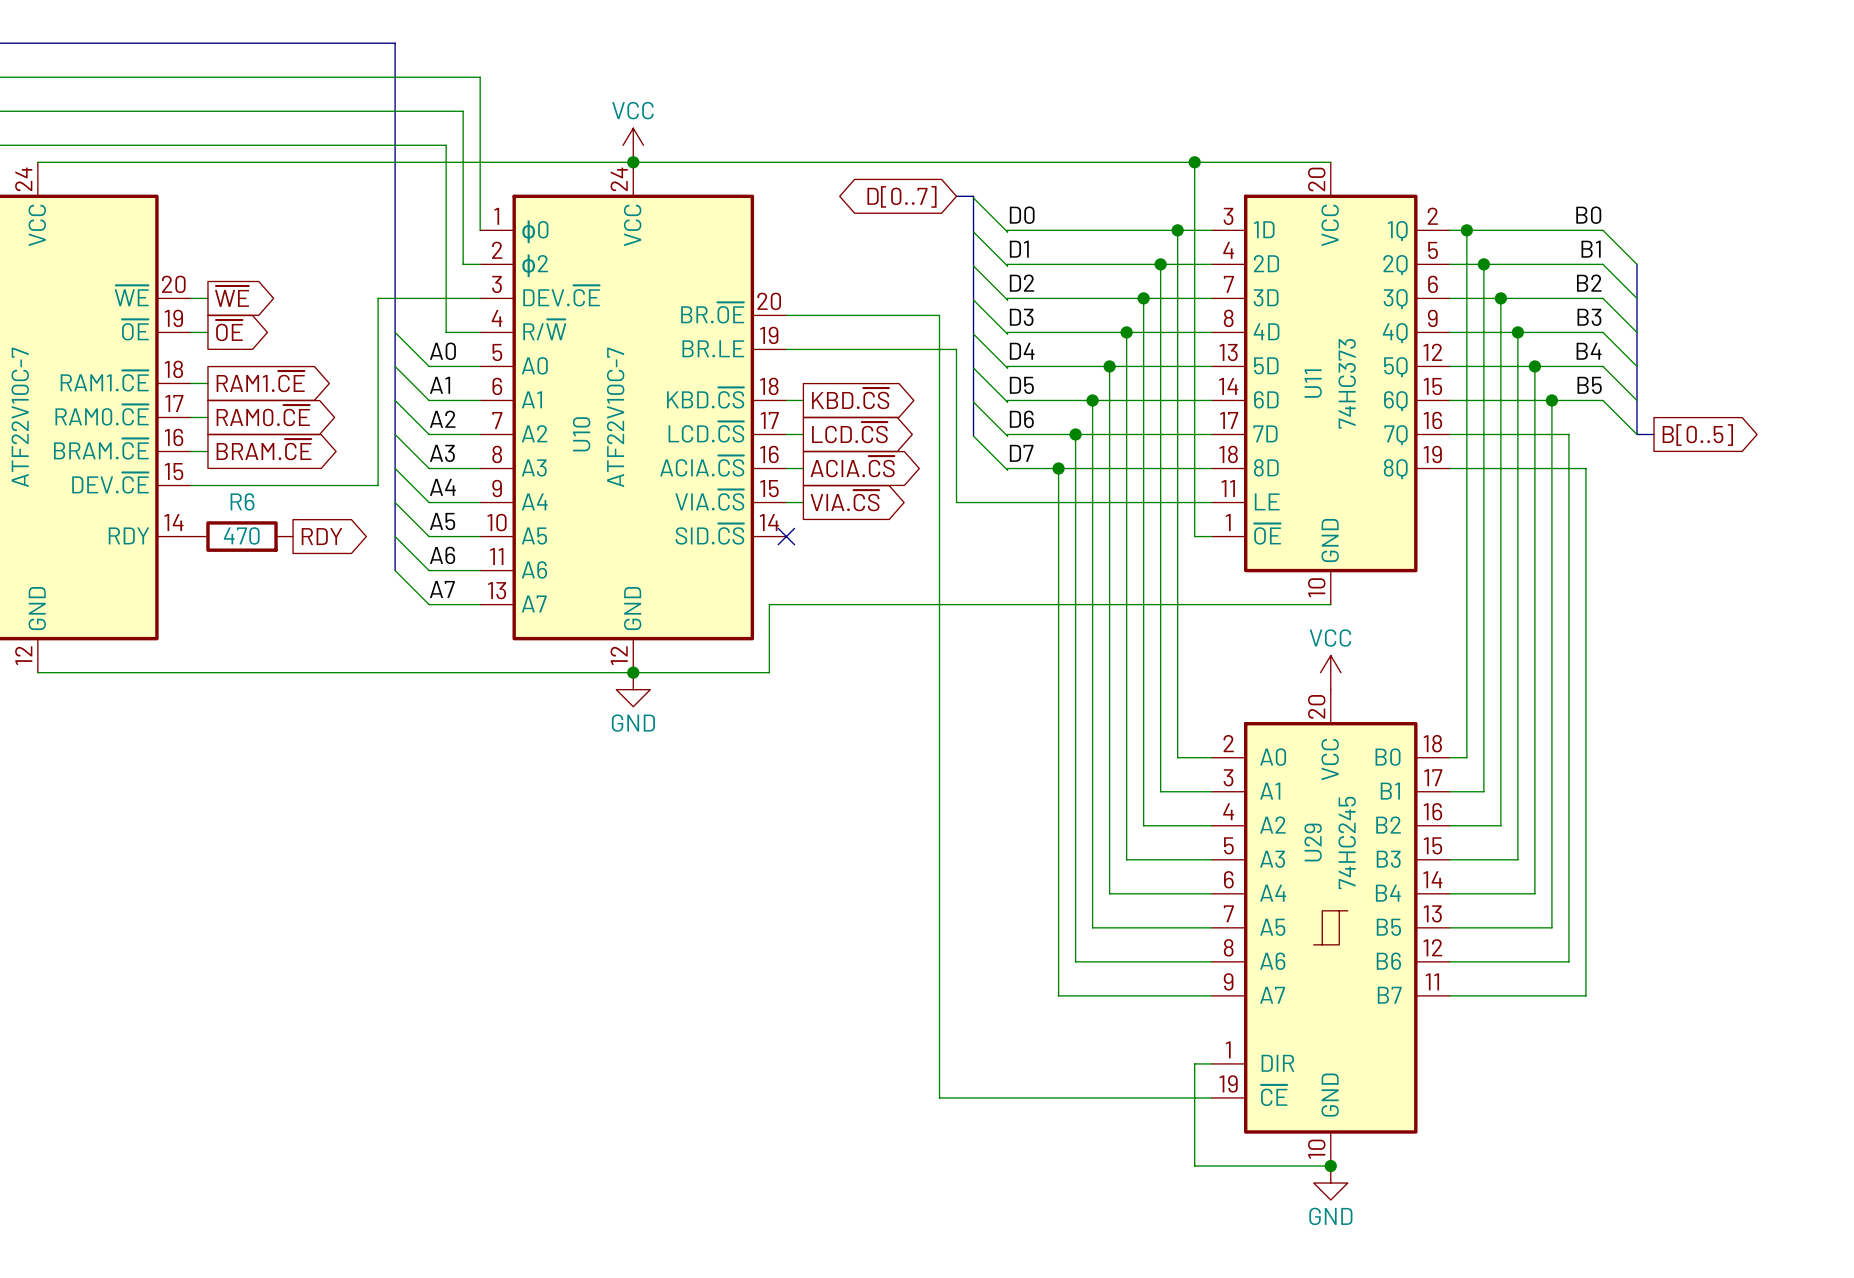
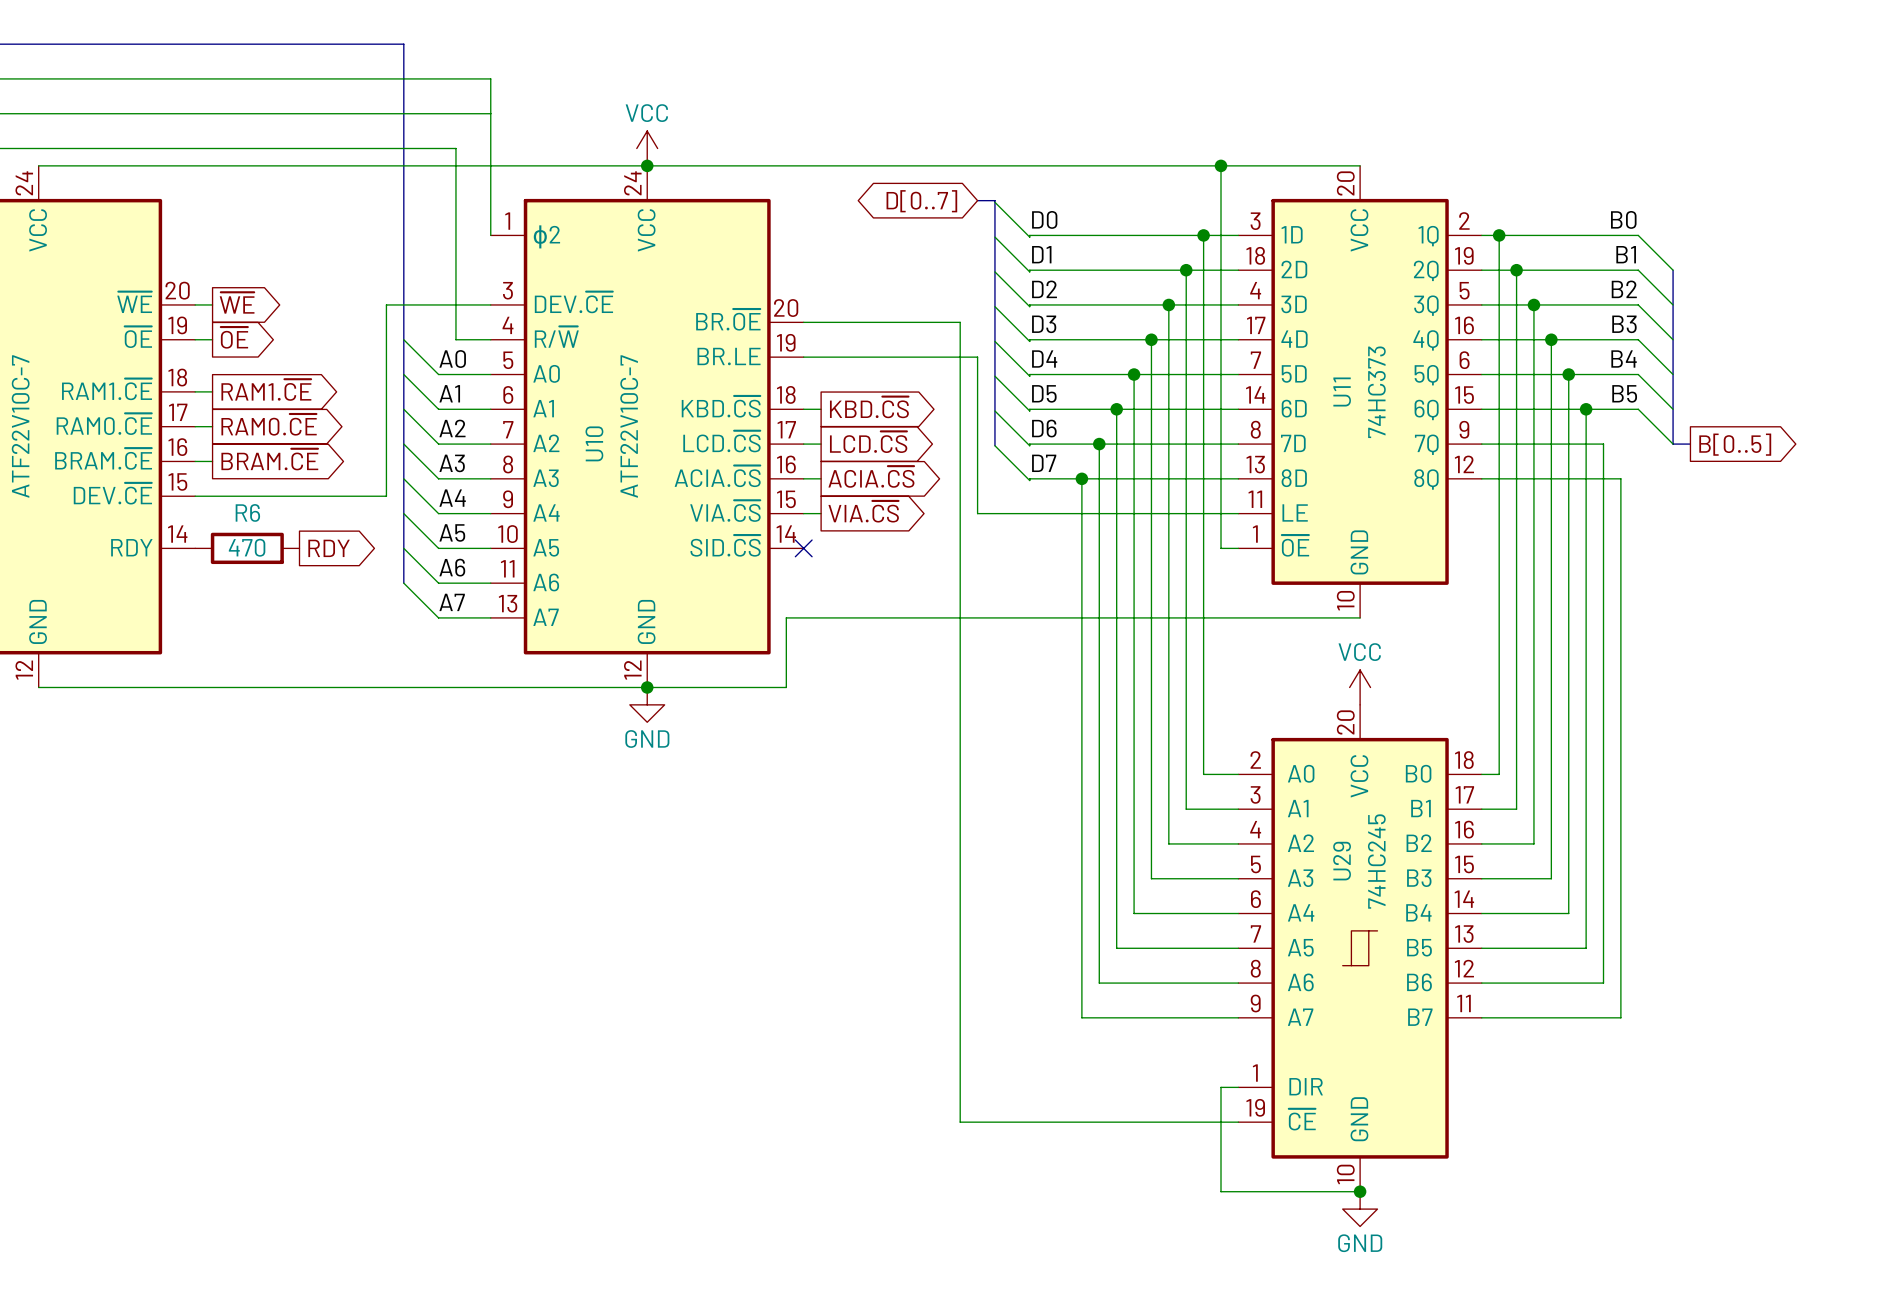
wire: (463, 111) (463, 264) (480, 264) -> (473, 113) (490, 113)
U10 symbol: [480, 162, 787, 673] -> [490, 165, 804, 688]
U11 symbol: [1211, 162, 1450, 605] -> [1238, 165, 1482, 618]

